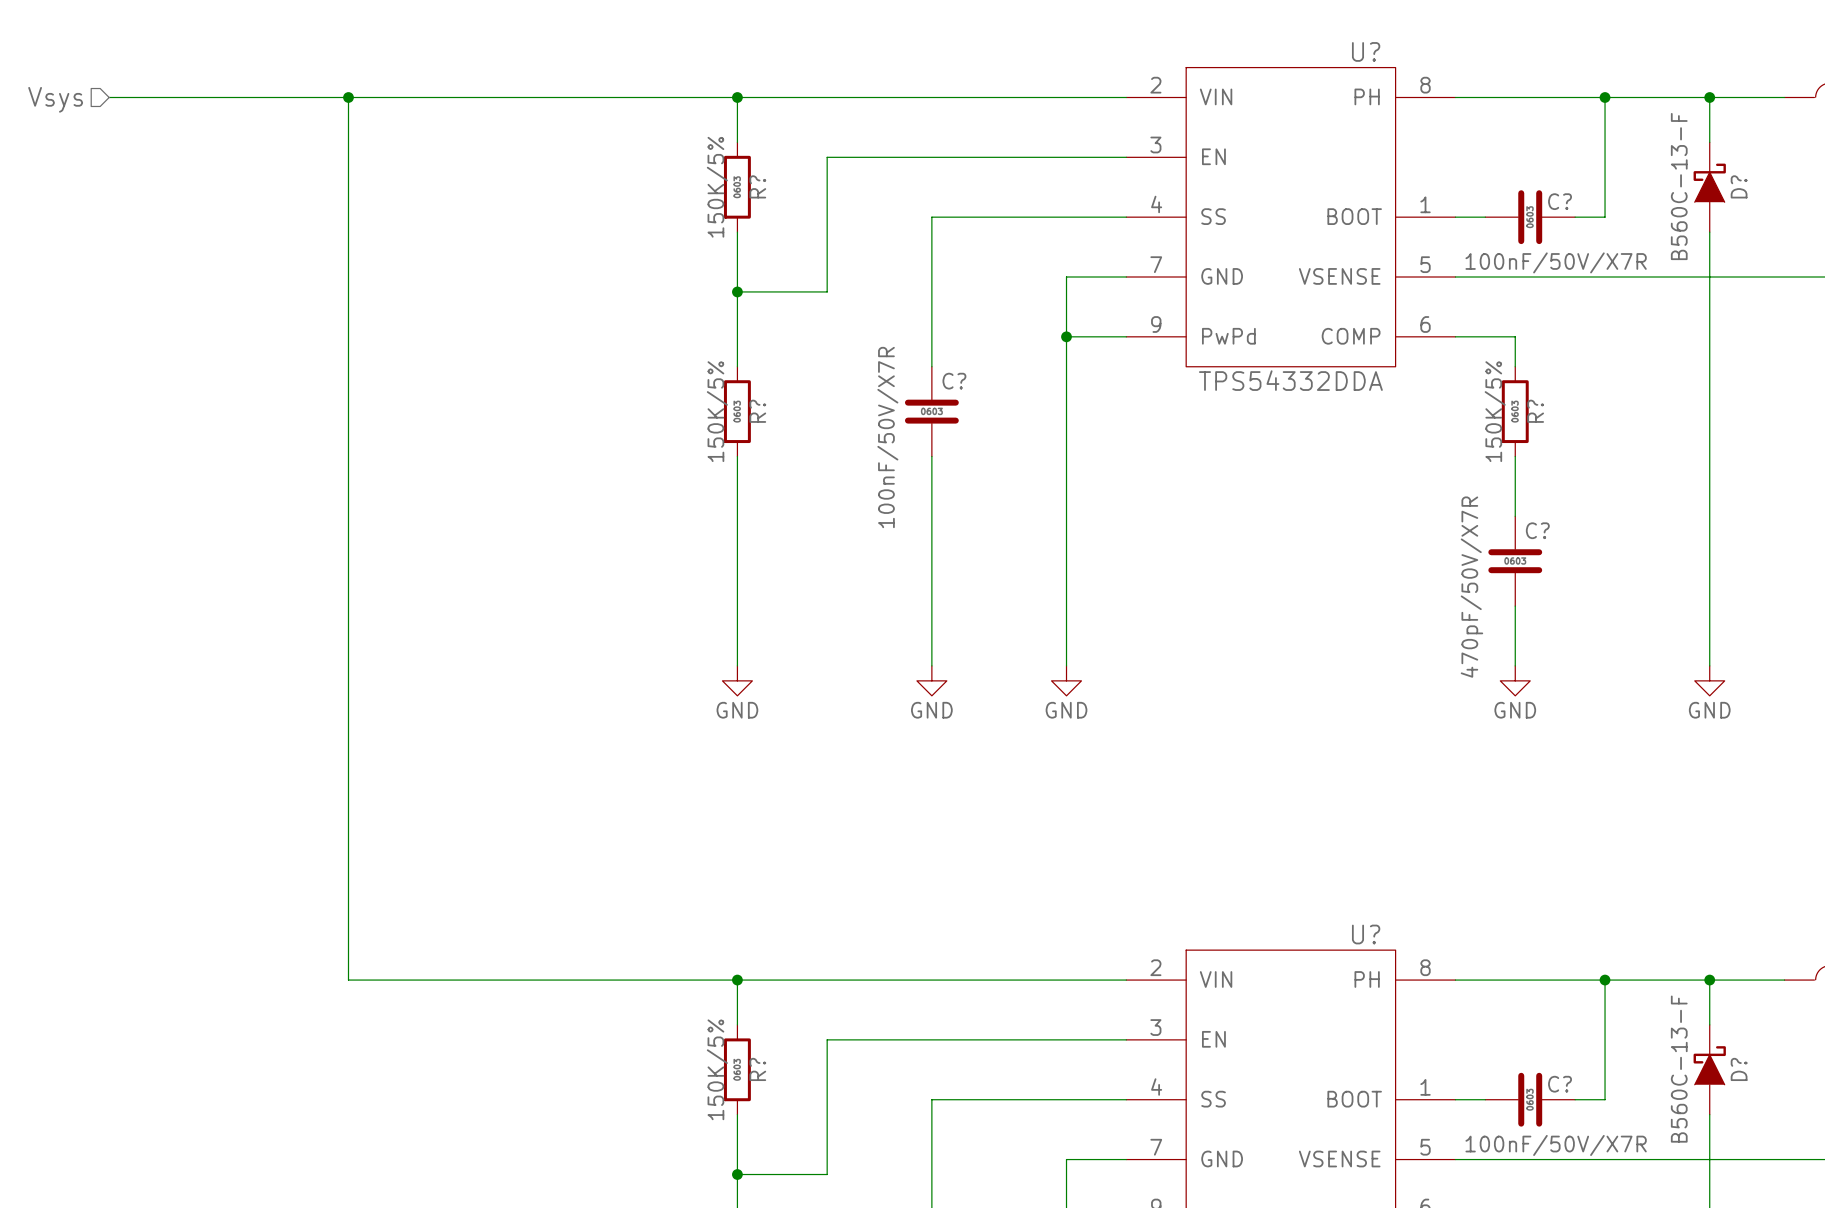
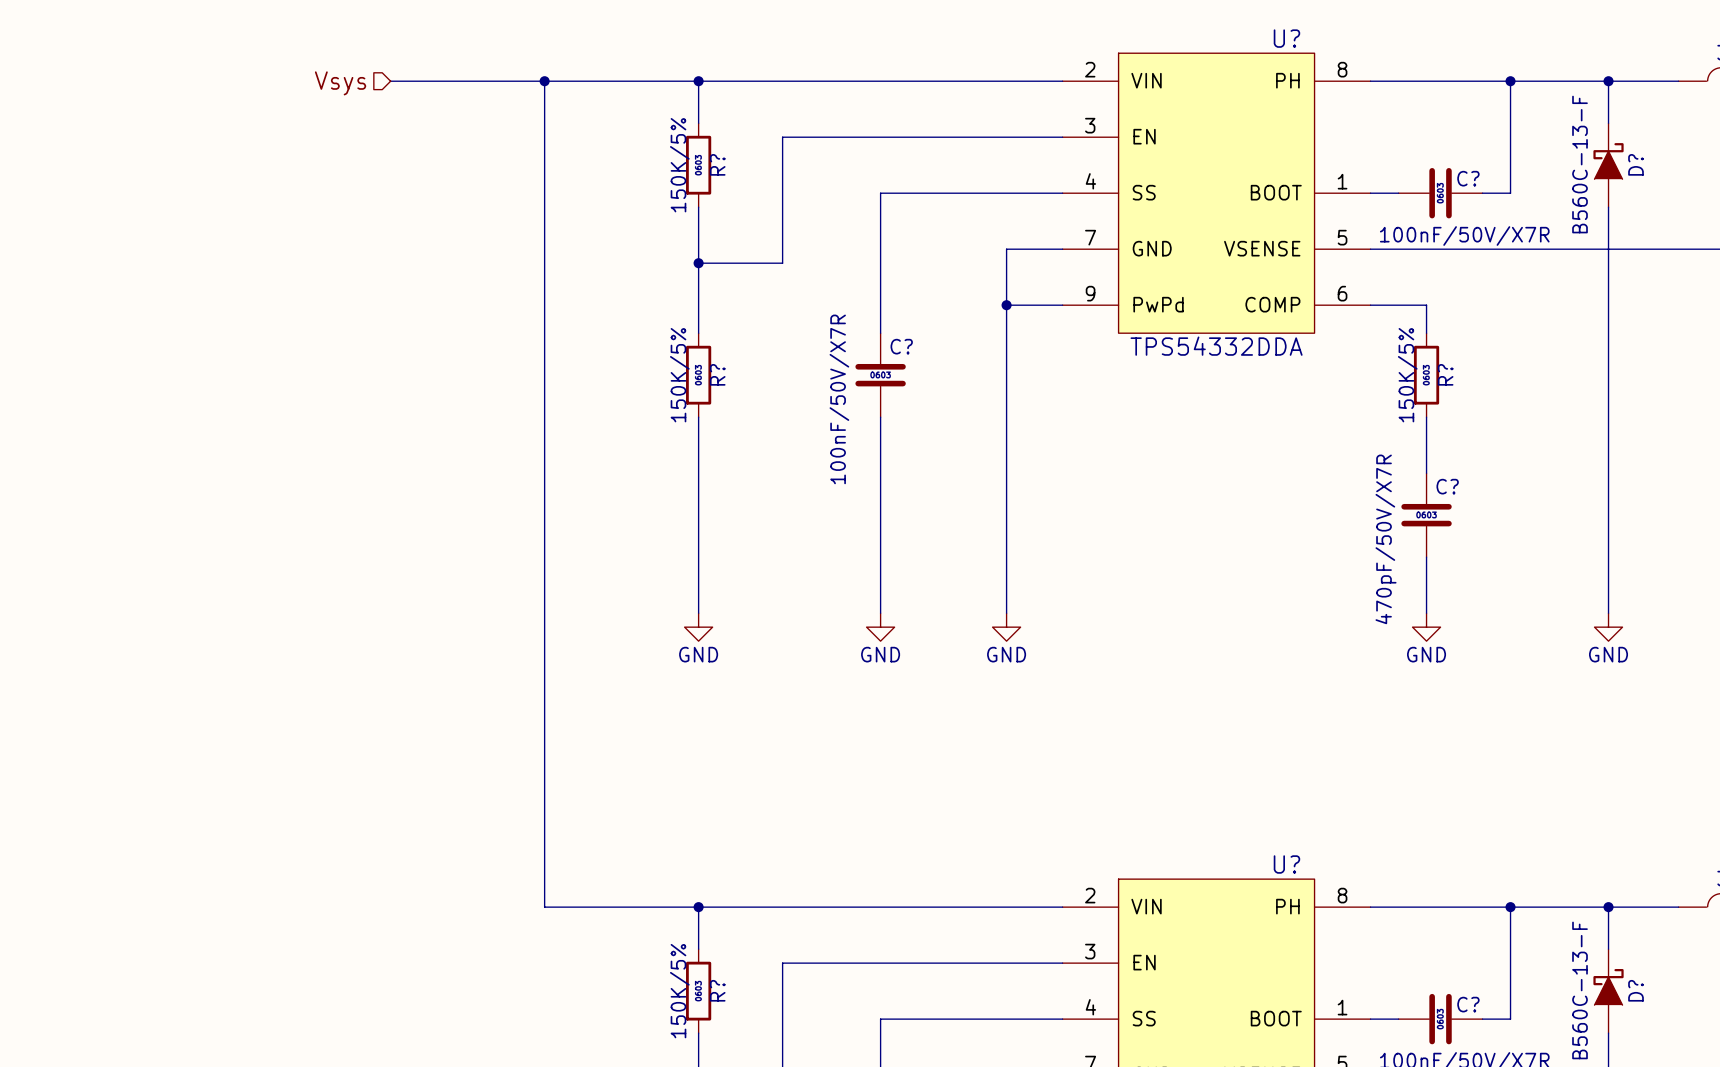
wire: (109, 97) (408, 97) -> none
wire: (348, 97) (348, 980) (572, 980) -> (544, 81) (544, 907)
junction: (348, 97) -> none
junction: none -> (544, 81)
hierarchical label: Vsys (55, 99) -> none
hierarchical label: none -> Vsys (340, 83)

